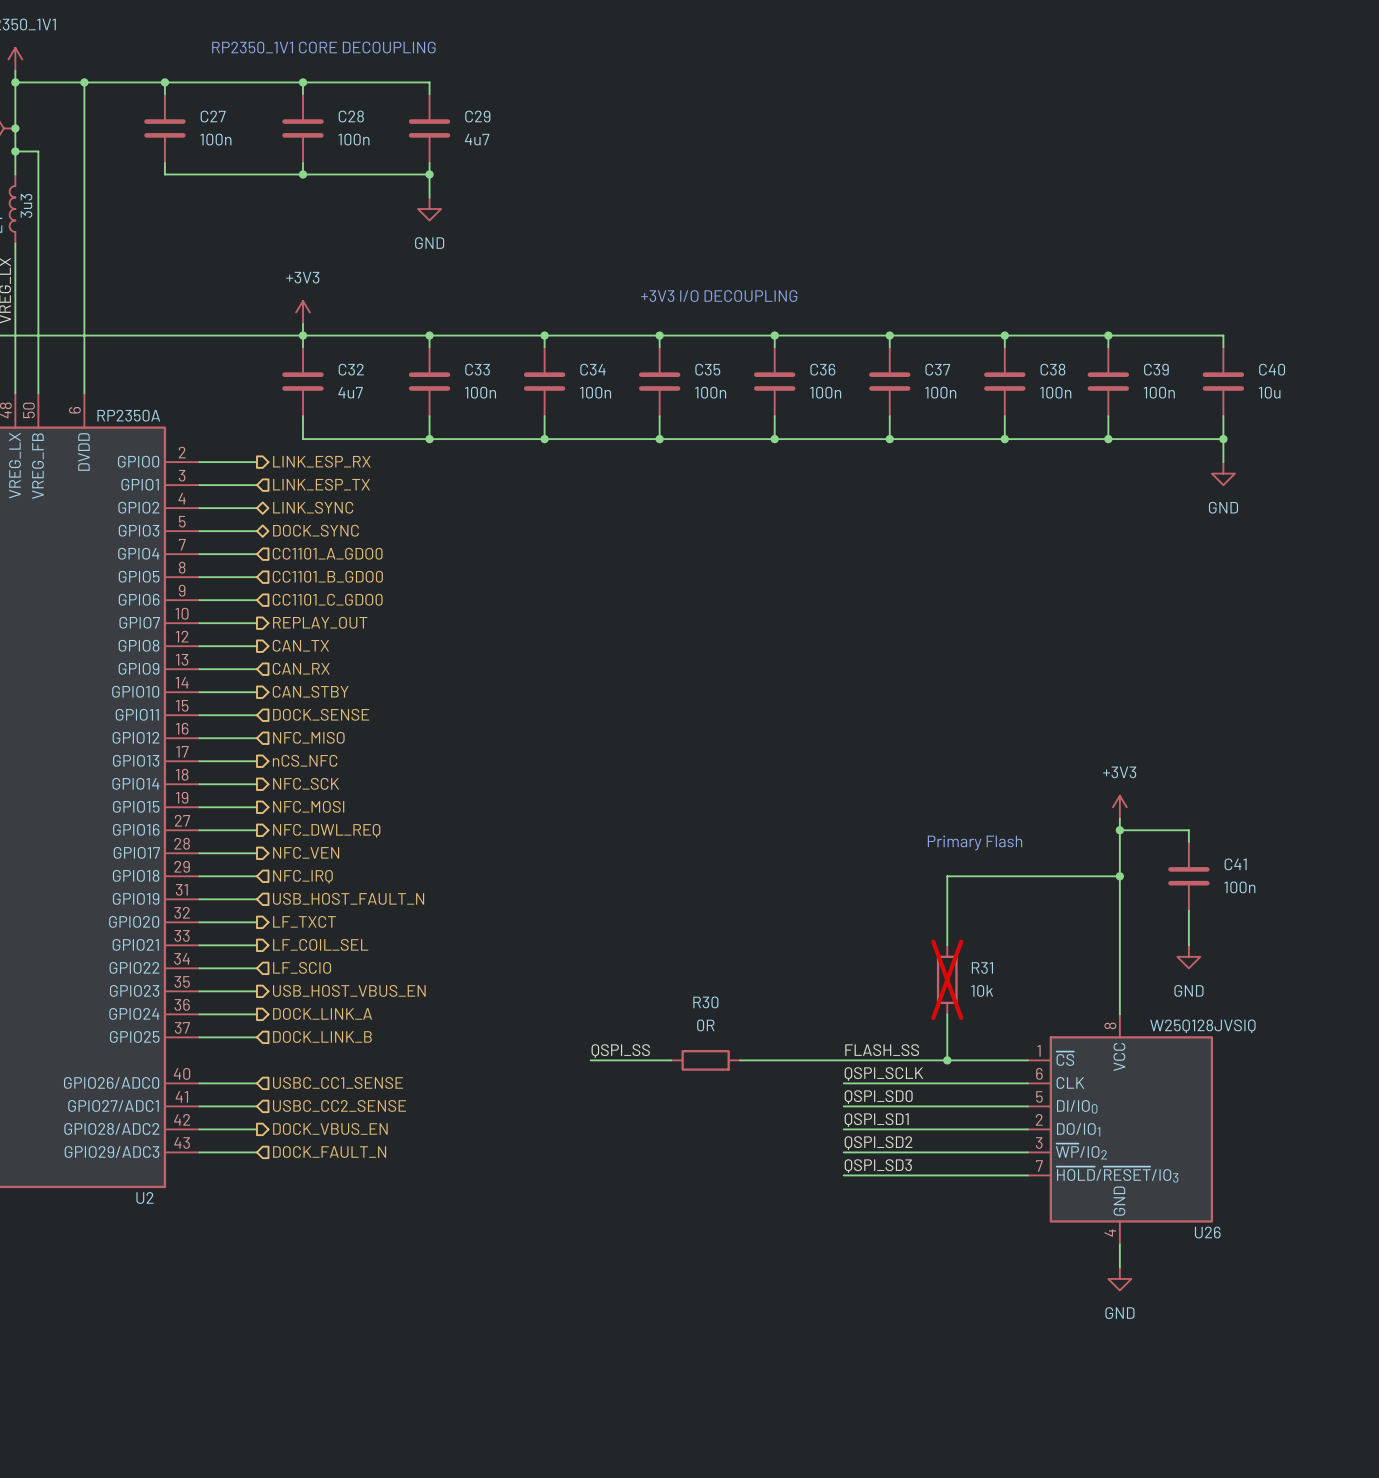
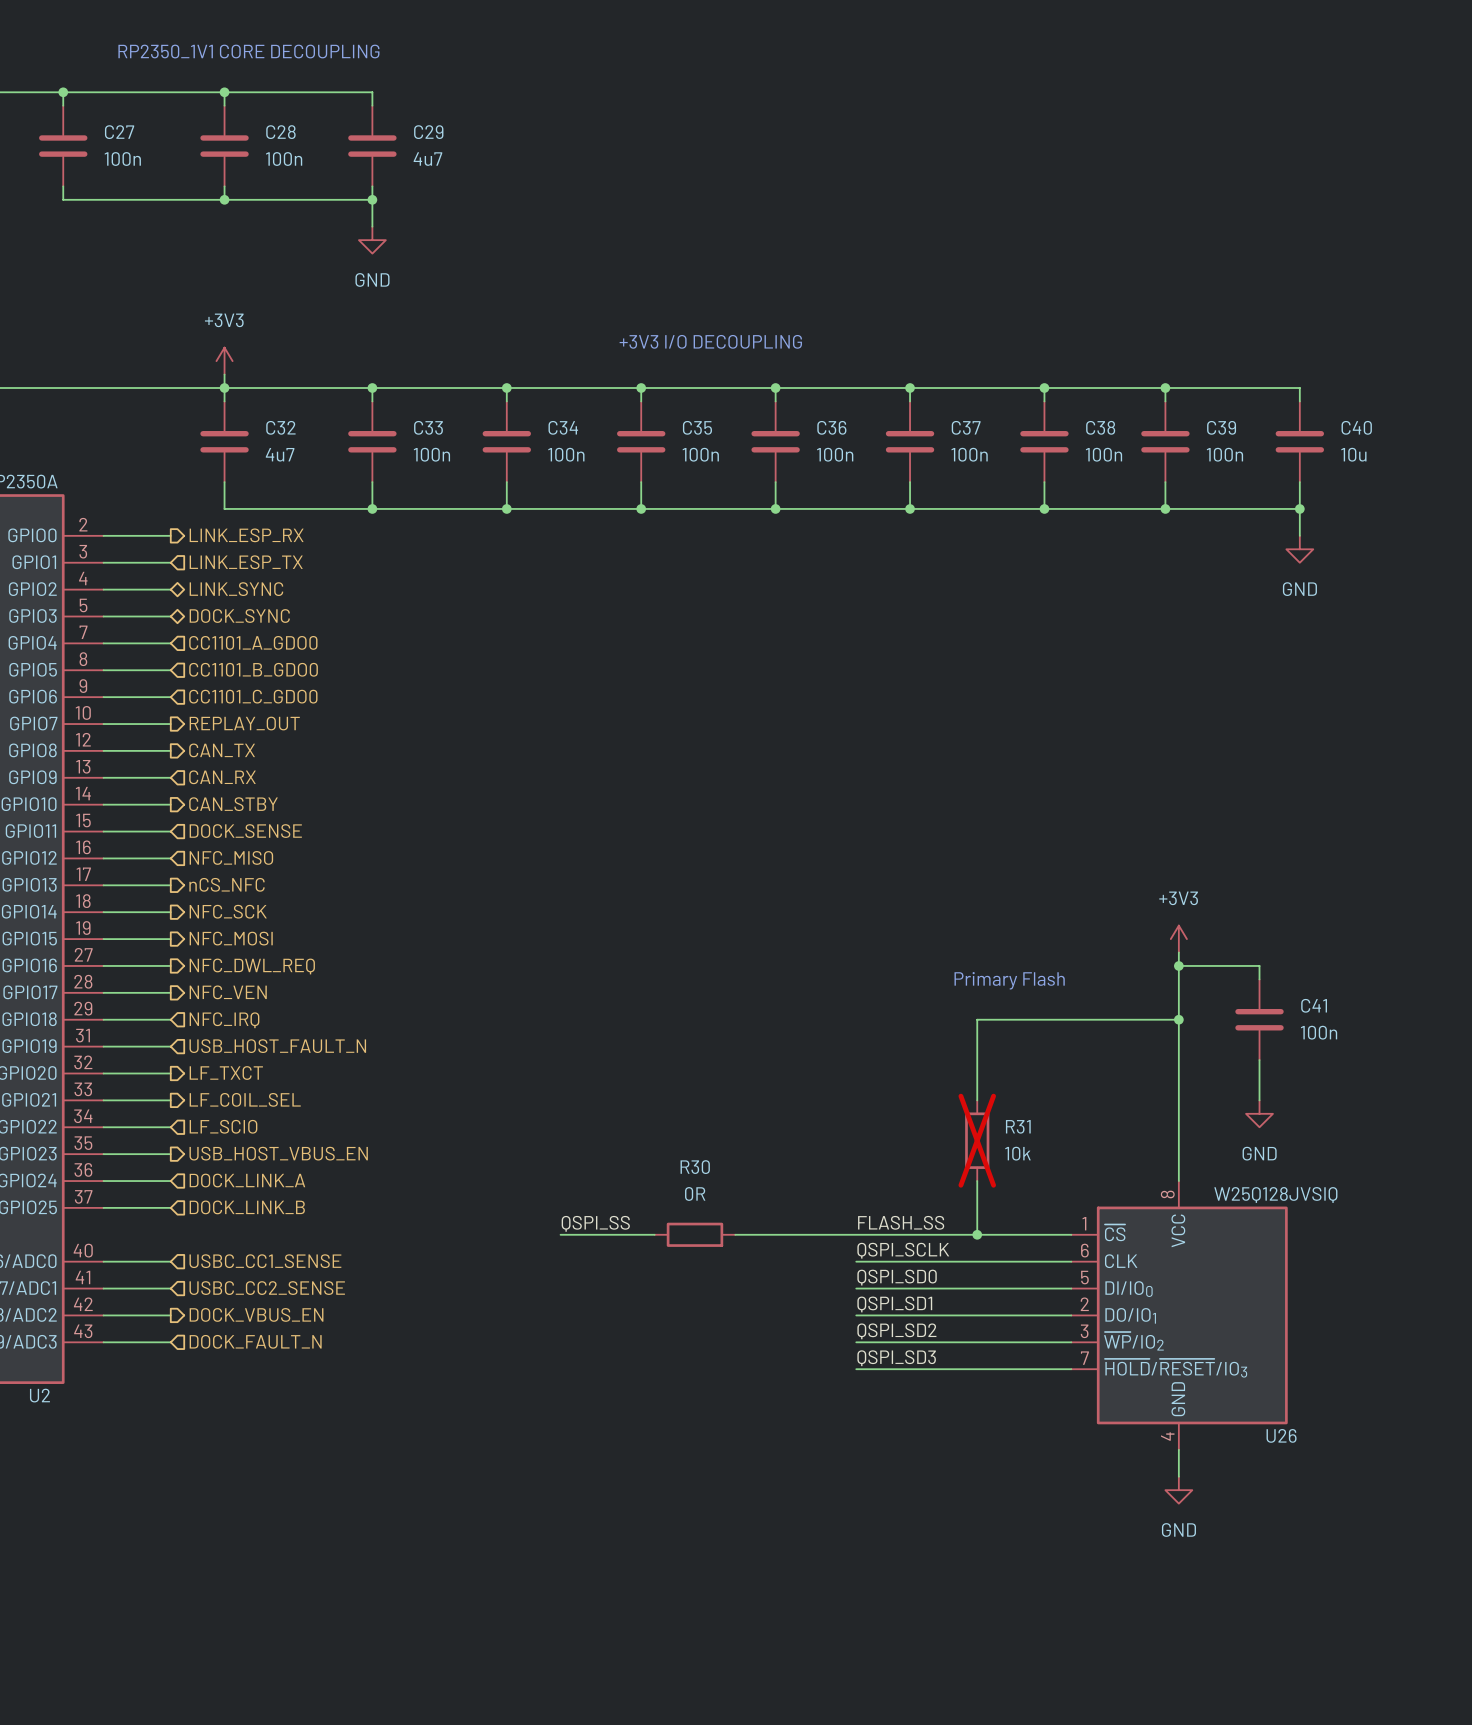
hierarchical label shape: output (322, 1013) -> input (247, 1180)

